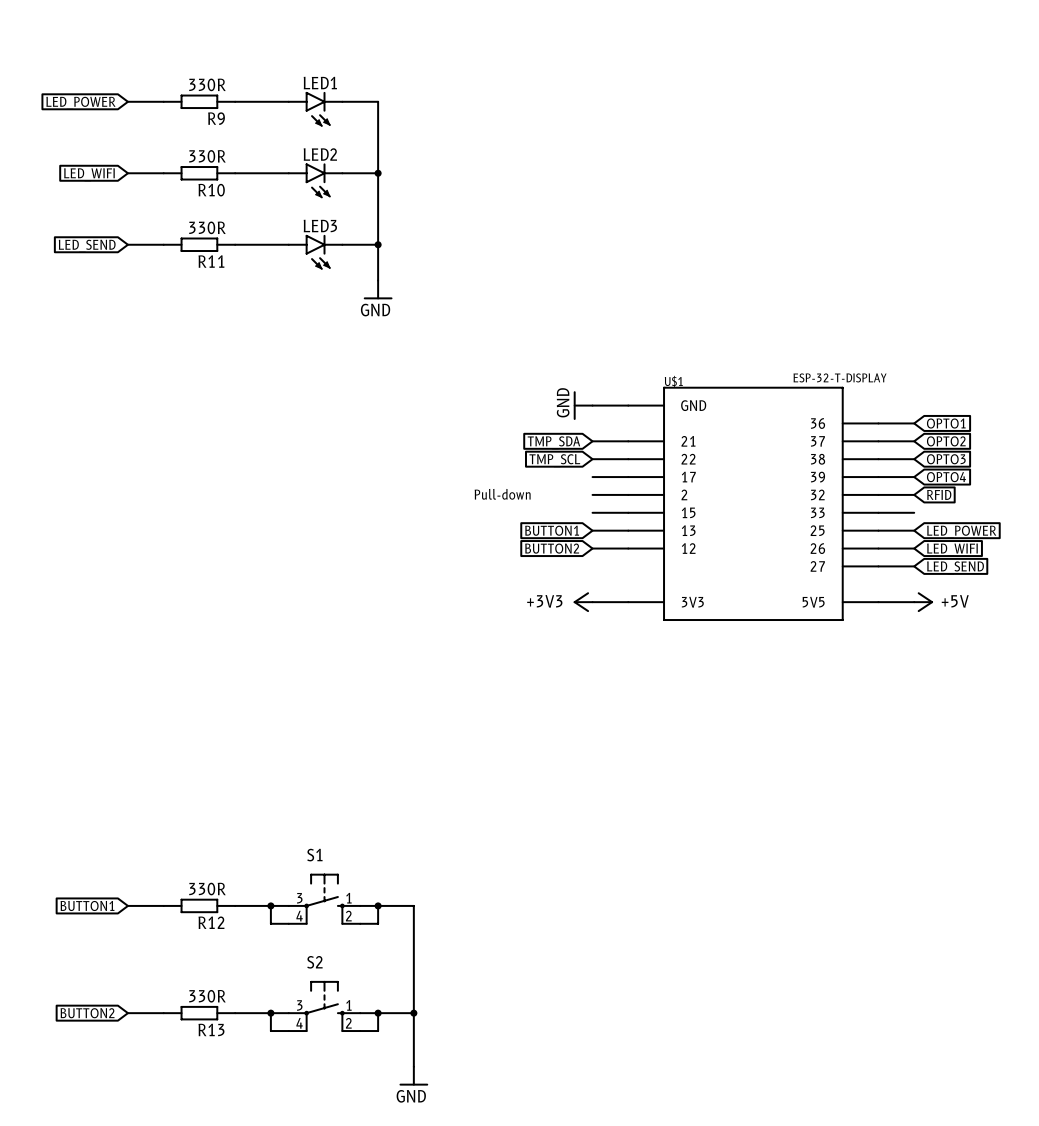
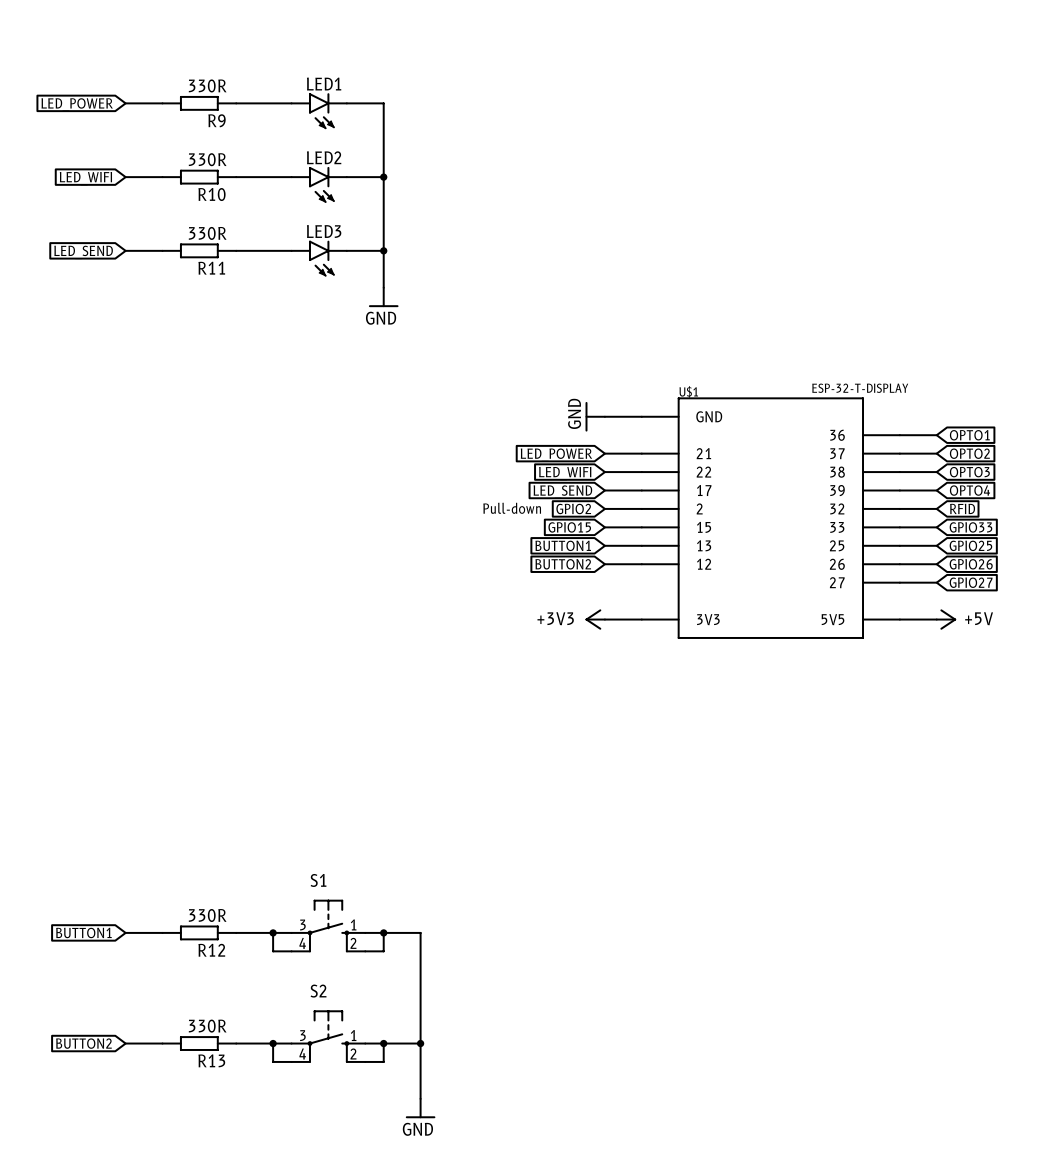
global label: TMP_SDA (553, 442) -> LED_POWER (556, 455)
global label: TMP_SCL (554, 460) -> LED_WIFI (565, 473)
global label: none -> LED_SEND (562, 492)
global label: none -> GPIO2 (573, 508)
global label: none -> GPIO15 (569, 527)
global label: none -> GPIO33 (970, 527)
global label: LED_POWER (961, 532) -> GPIO25 (970, 545)
global label: LED_WIFI (952, 550) -> GPIO26 (971, 564)
global label: LED_SEND (955, 567) -> GPIO27 (971, 582)

